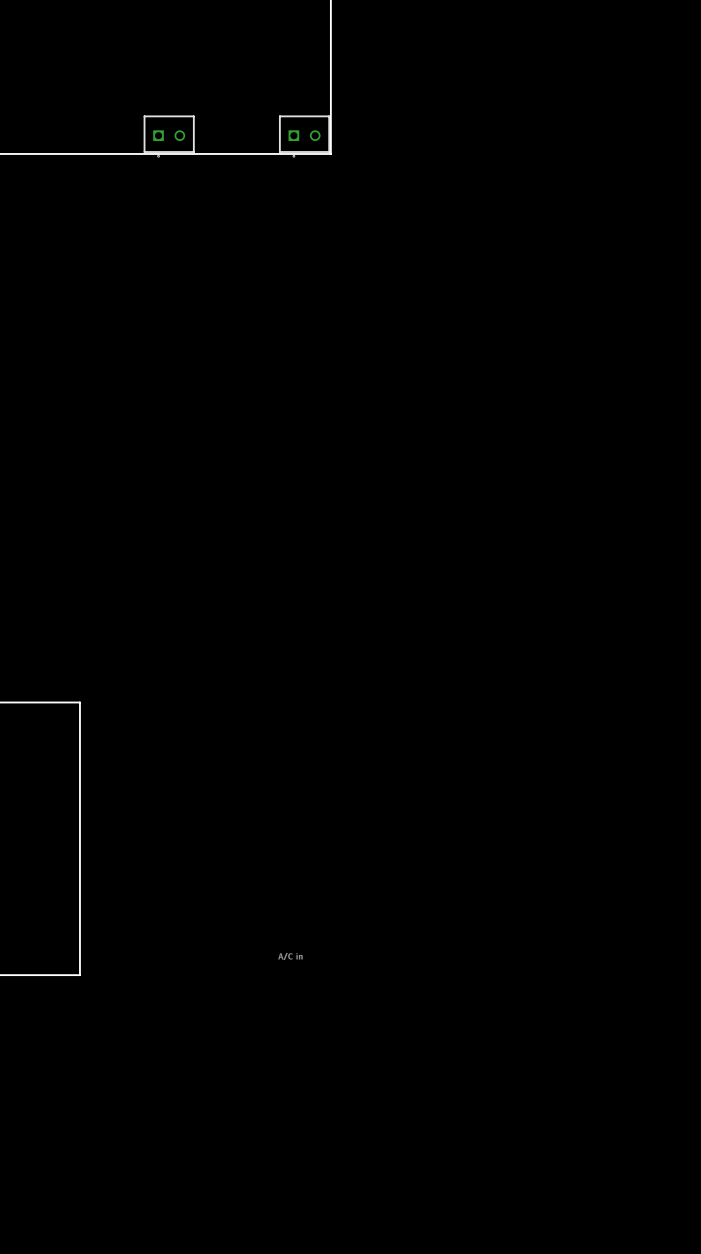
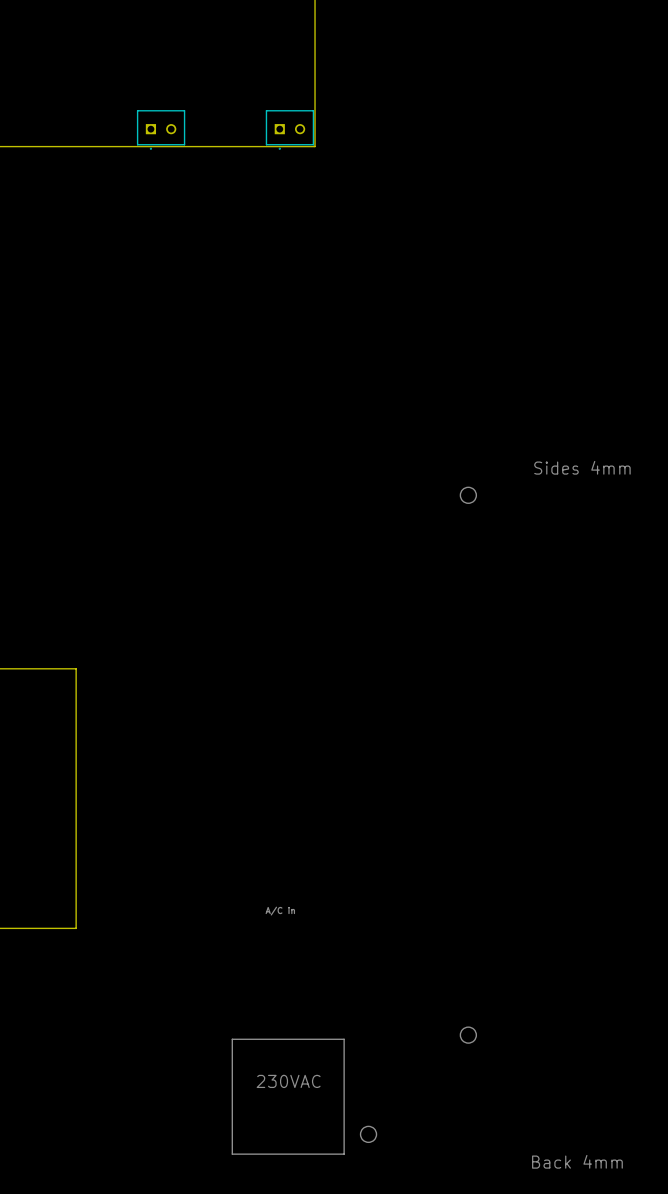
text: none -> Sides 4mm (582, 467)
drawing: none -> [460, 487, 477, 504]
drawing: none -> [460, 1026, 477, 1044]
line: none -> (232, 1039) (344, 1039) (344, 1154) (232, 1154) (232, 1039)
text: none -> 230VAC (288, 1081)
drawing: none -> [360, 1126, 377, 1143]
text: none -> Back 4mm (577, 1161)

